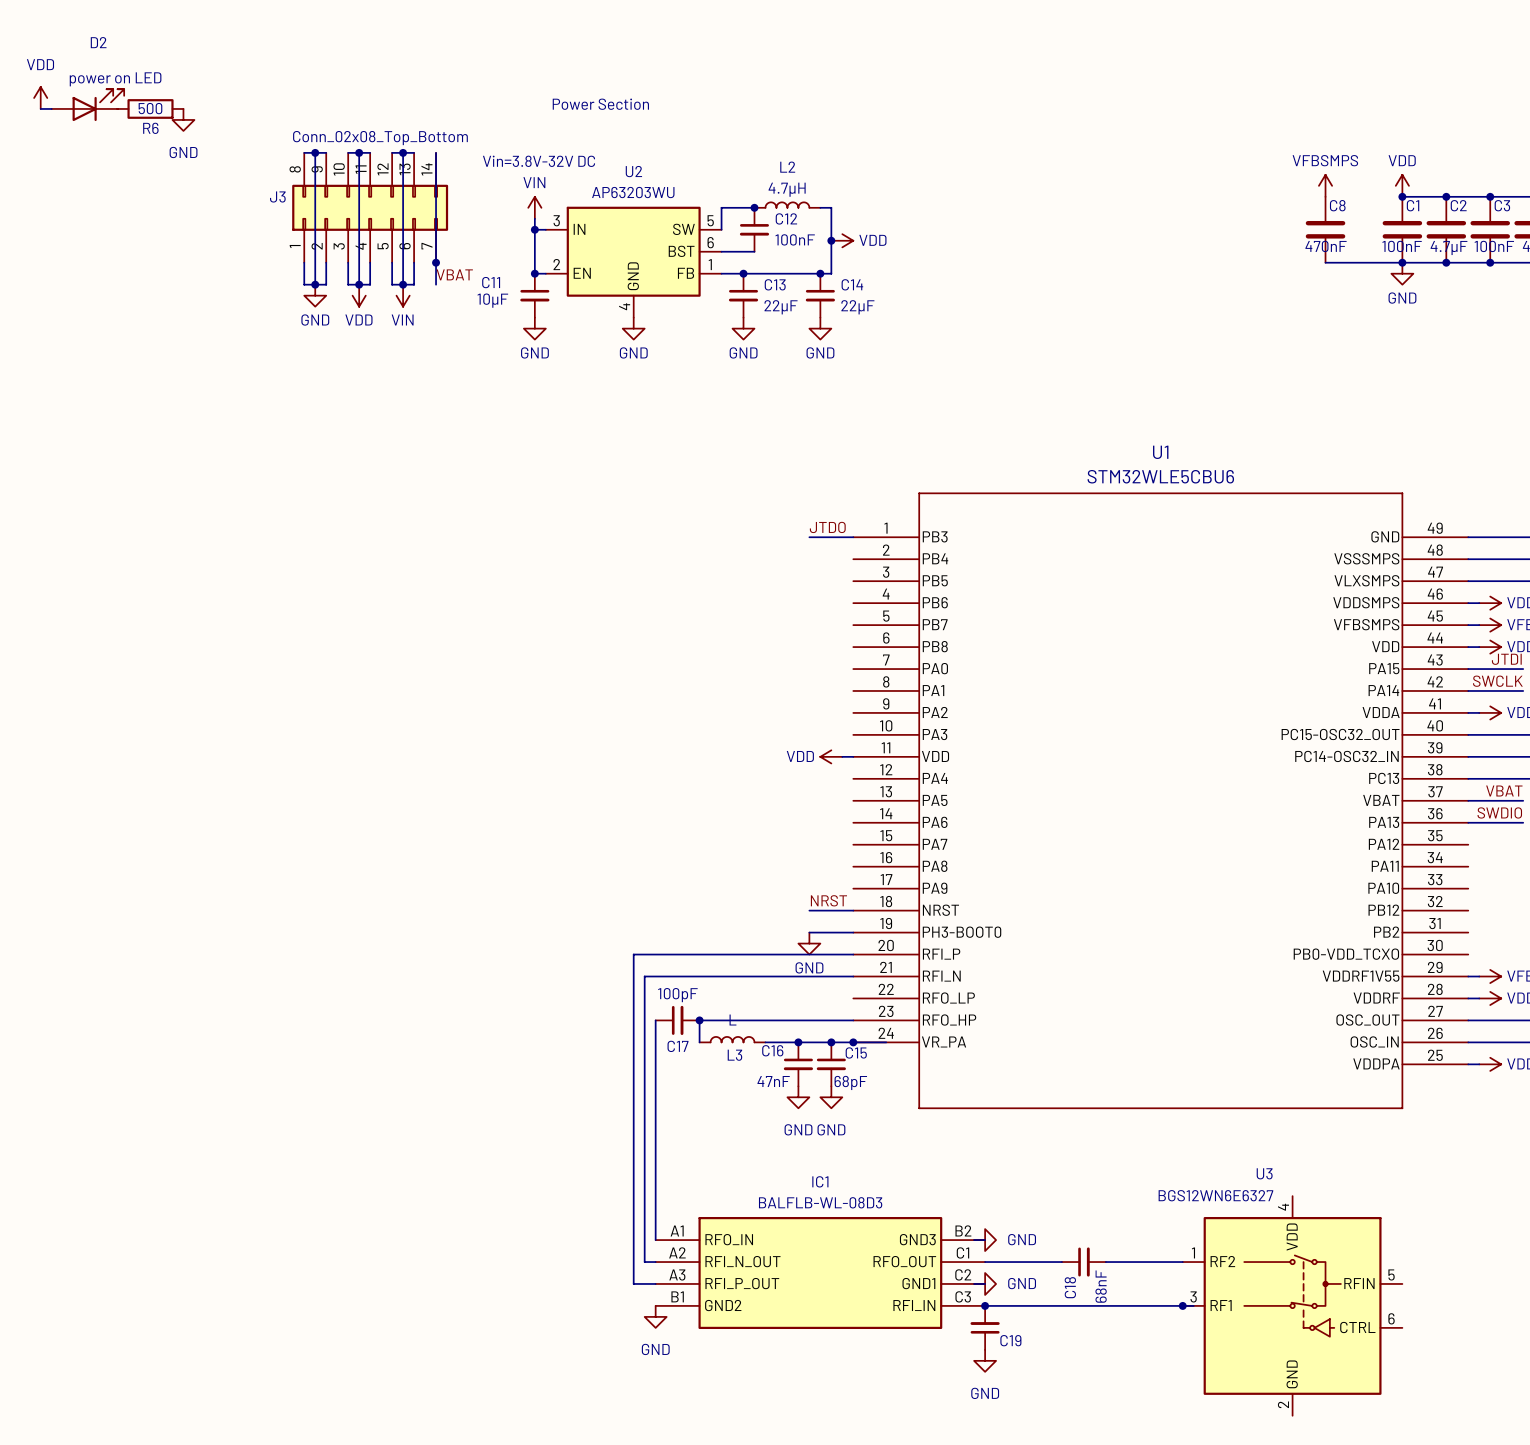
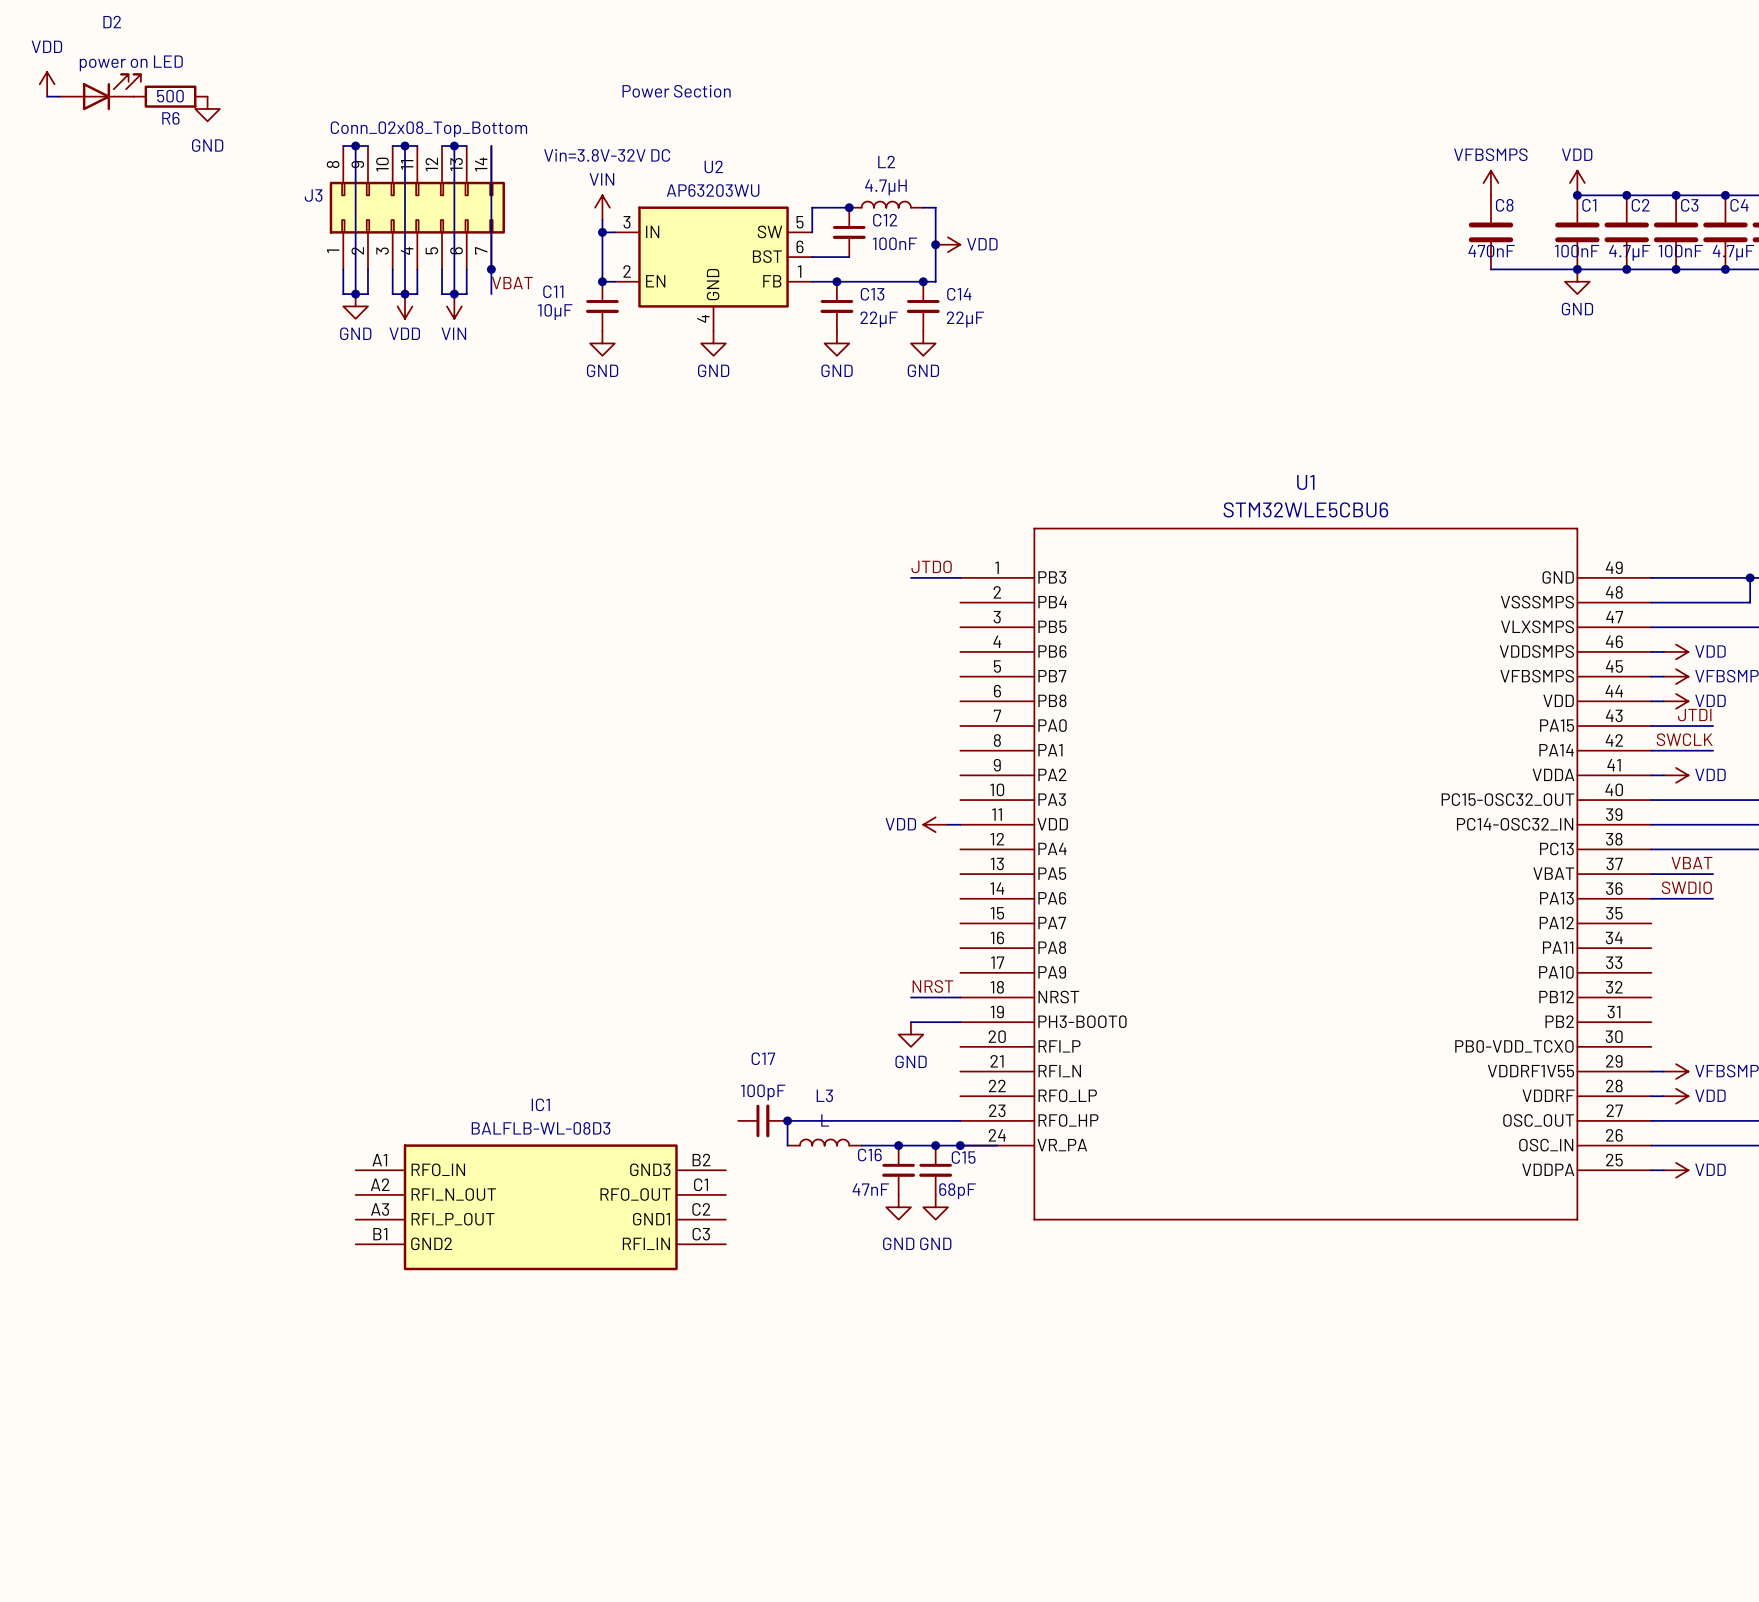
wire: (853, 954) (633, 954) (633, 1283) (655, 1283) -> none
wire: (853, 976) (644, 976) (644, 1262) (655, 1262) -> none
wire: (655, 1020) (655, 1240) -> none
C17 name position: C17 (678, 1046) -> C17 (763, 1058)
L3 name position: L3 (734, 1055) -> L3 (824, 1095)
wire: (974, 1240) (985, 1240) -> none
power symbol: GND (985, 1240) -> none
wire: (985, 1262) (1061, 1262) -> none
C18: 68nF (1083, 1262) -> none
wire: (1105, 1262) (1182, 1262) -> none
IC1 position: (820, 1273) -> (540, 1207)
wire: (974, 1283) (985, 1283) -> none
power symbol: GND (985, 1283) -> none
wire: (985, 1305) (1193, 1305) -> none
junction: (985, 1305) -> none
junction: (1182, 1305) -> none
U3: BGS12WN6E6327 (1292, 1305) -> none
power symbol: GND (655, 1316) -> none
C19: (985, 1327) -> none
power symbol: GND (985, 1360) -> none

